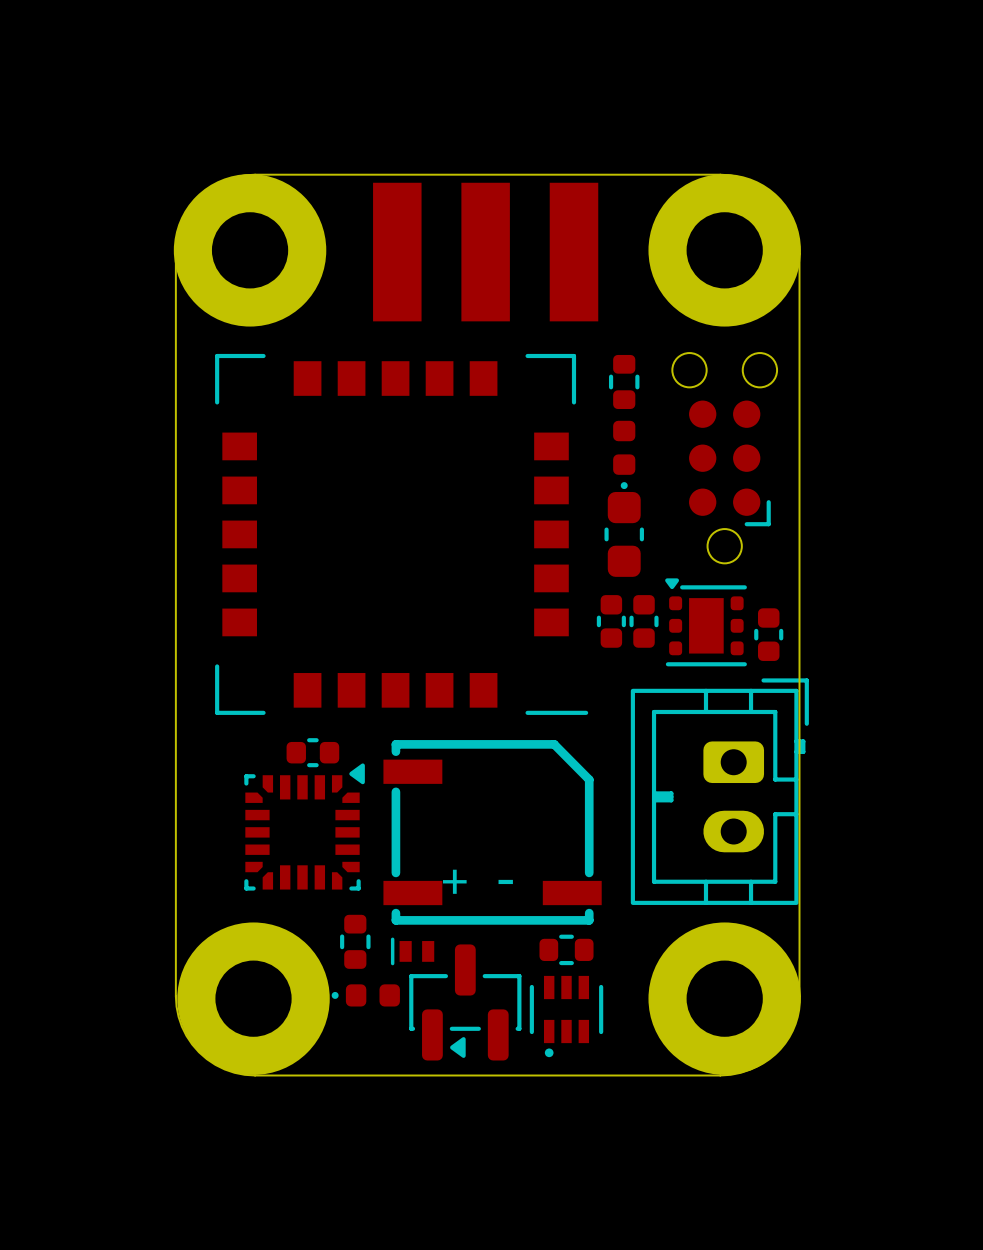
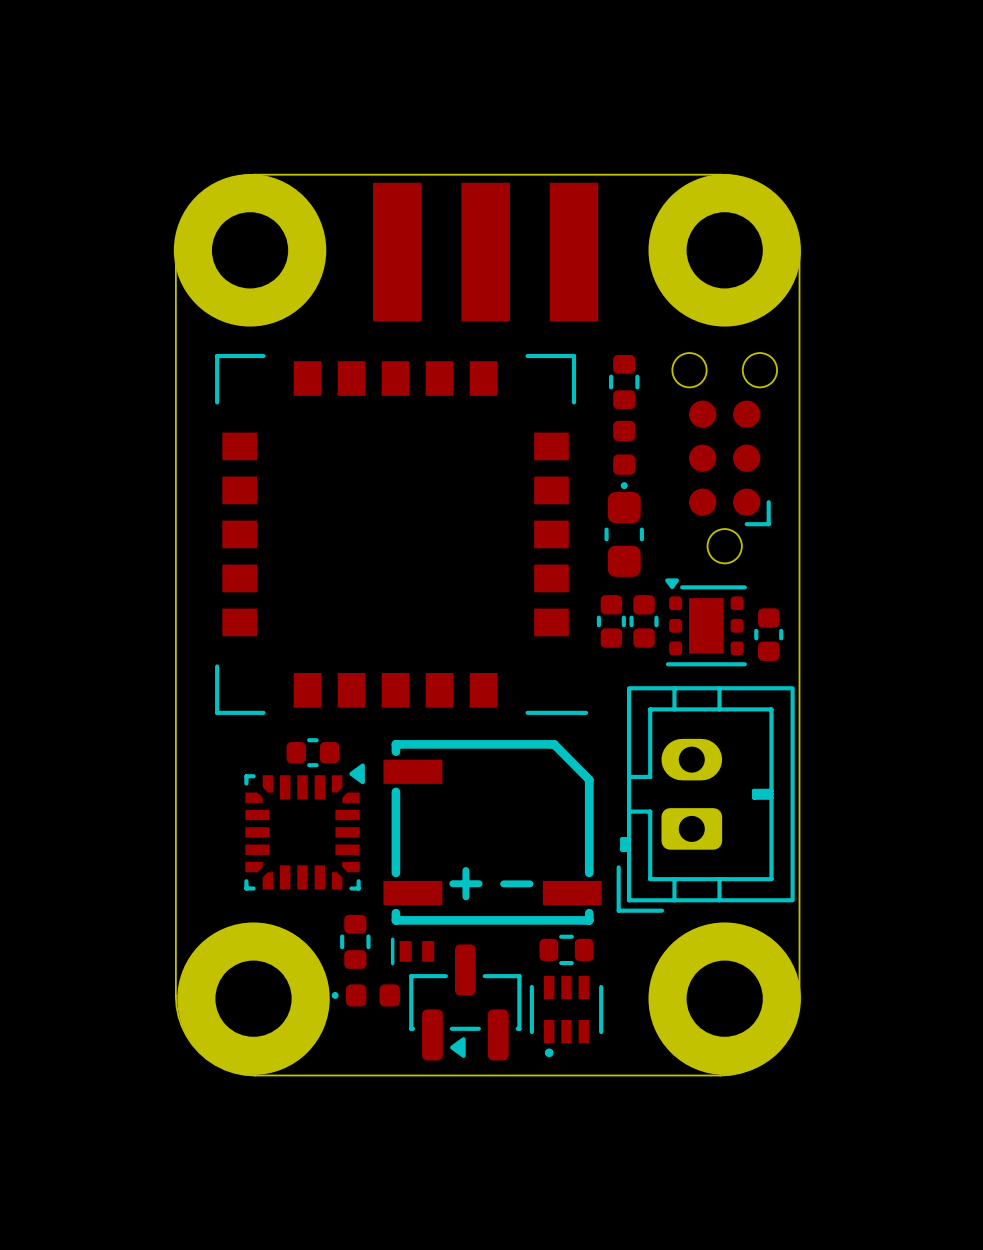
part rotation: 0° (719, 791) -> 180° (705, 799)

